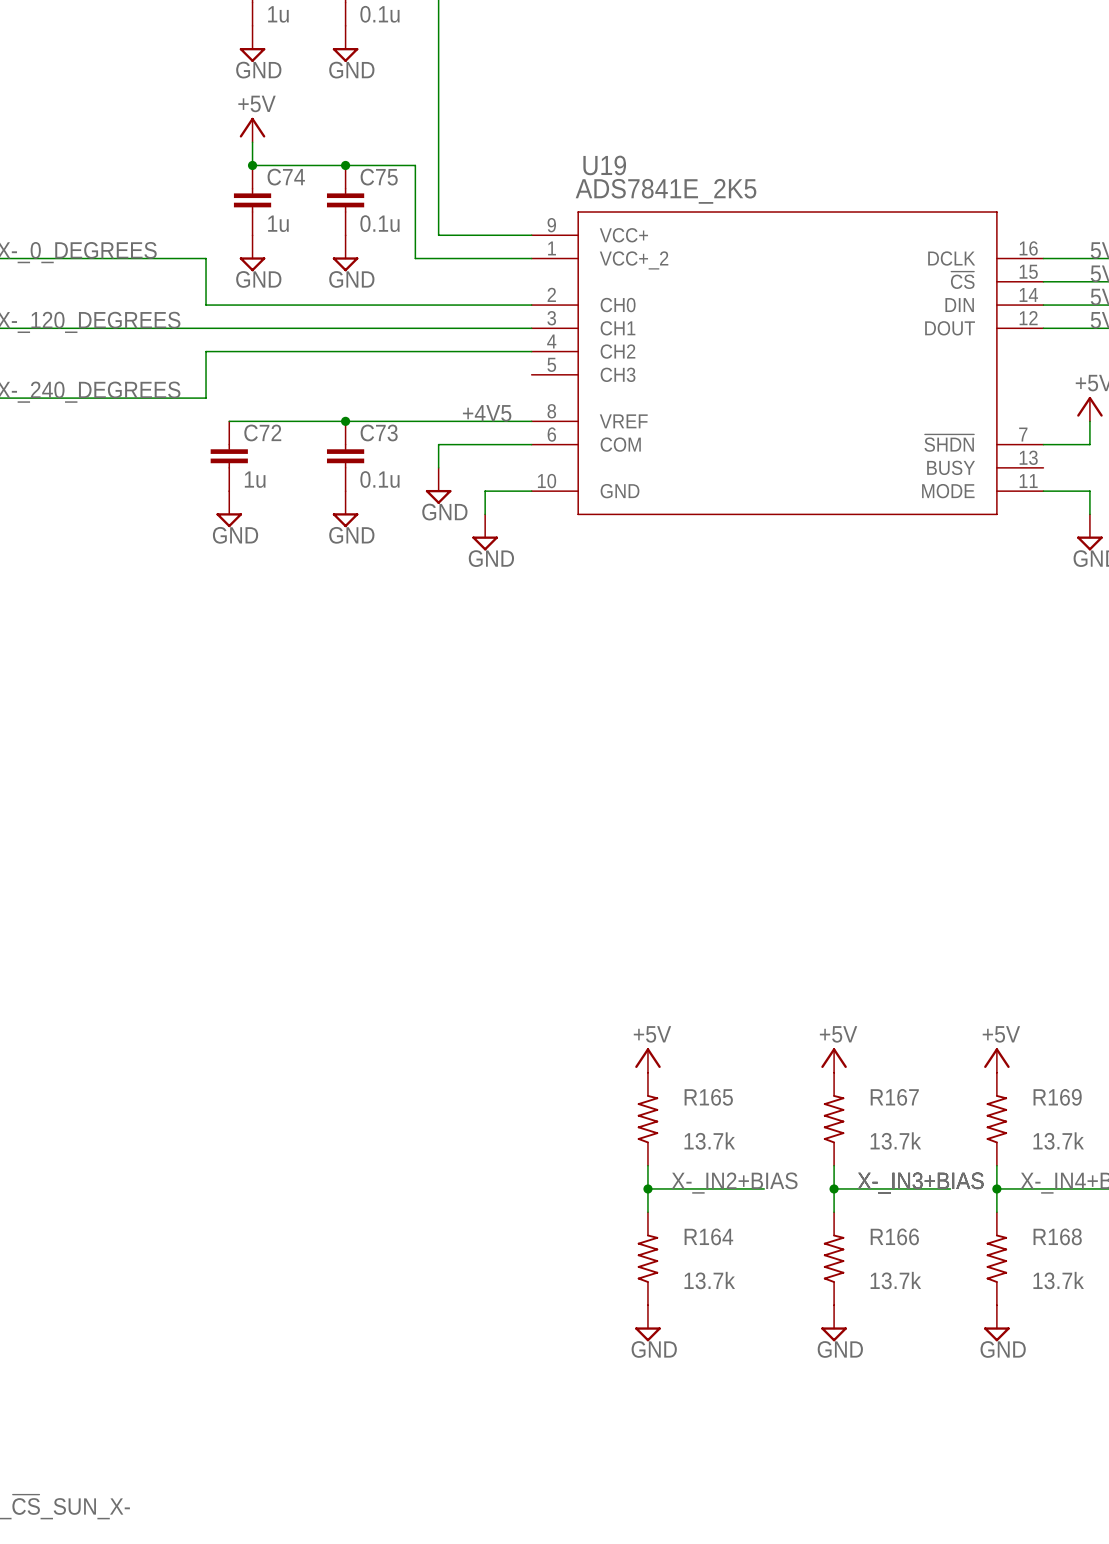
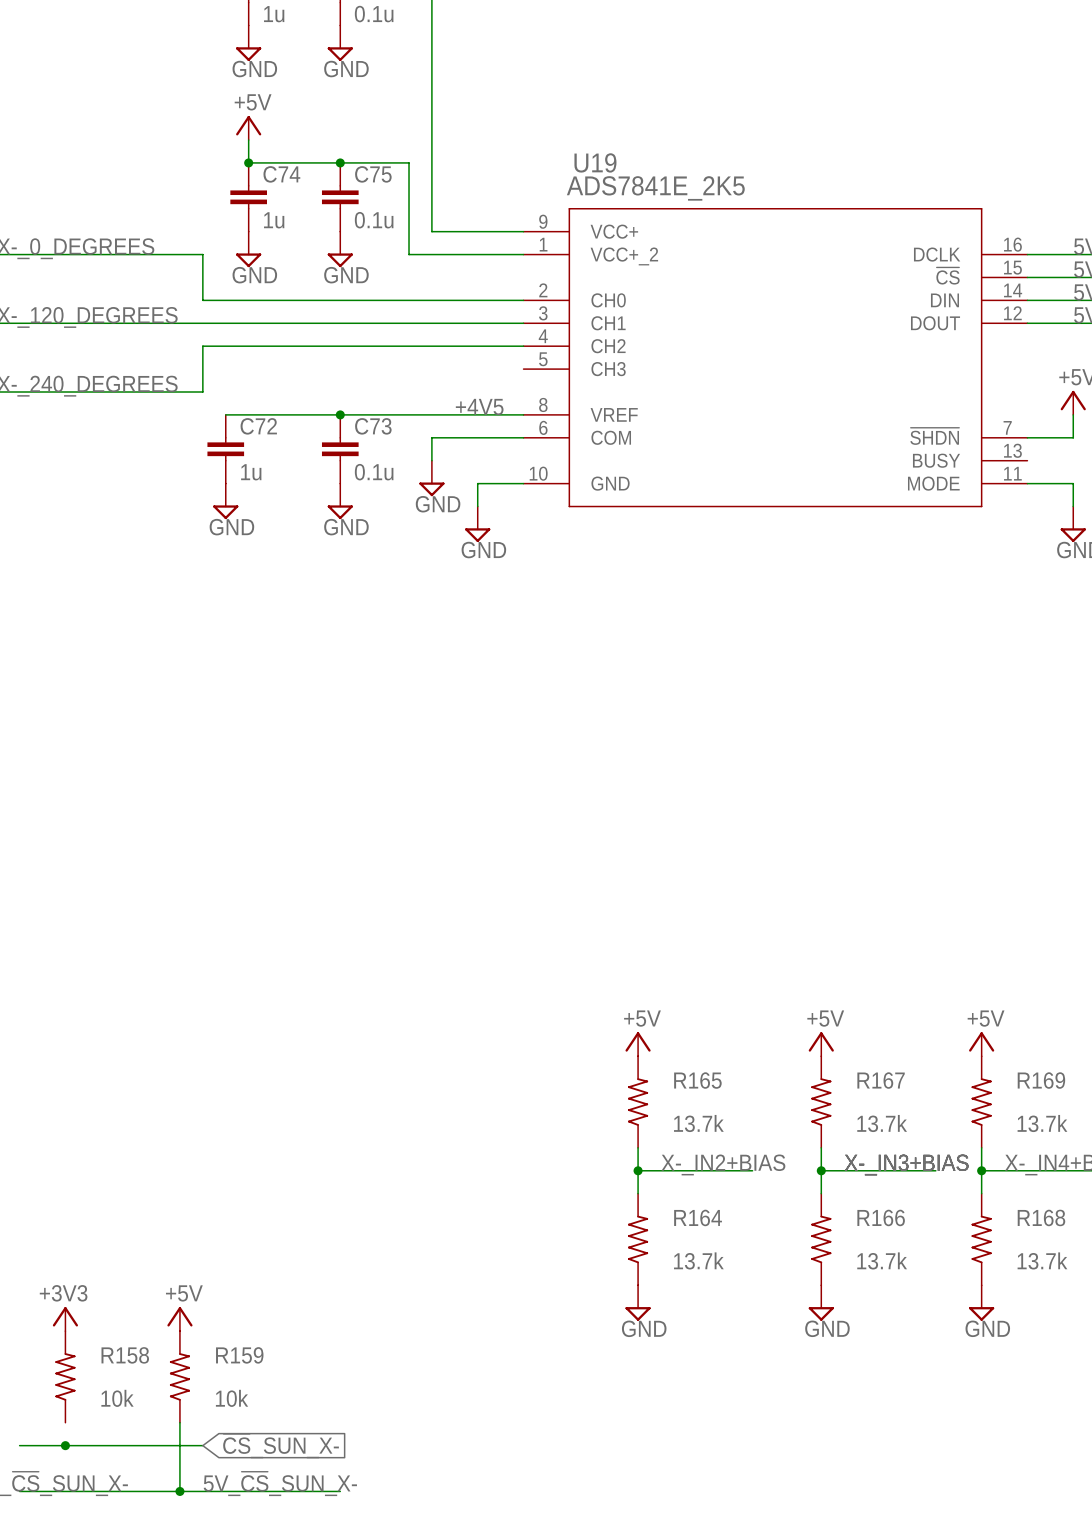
power symbol: none -> +3V3 (65, 1319)
power symbol: none -> +5V (179, 1319)
R158: none -> 10k (65, 1376)
R159: none -> 10k (179, 1376)
wire: none -> (179, 1422) (179, 1491)
wire: none -> (19, 1445) (202, 1445)
junction: none -> (65, 1445)
global label: none -> ~{CS}_SUN_X- (281, 1446)
label: none -> 5V_~{CS}_SUN_X- (280, 1483)
wire: none -> (19, 1491) (340, 1491)
junction: none -> (179, 1491)

